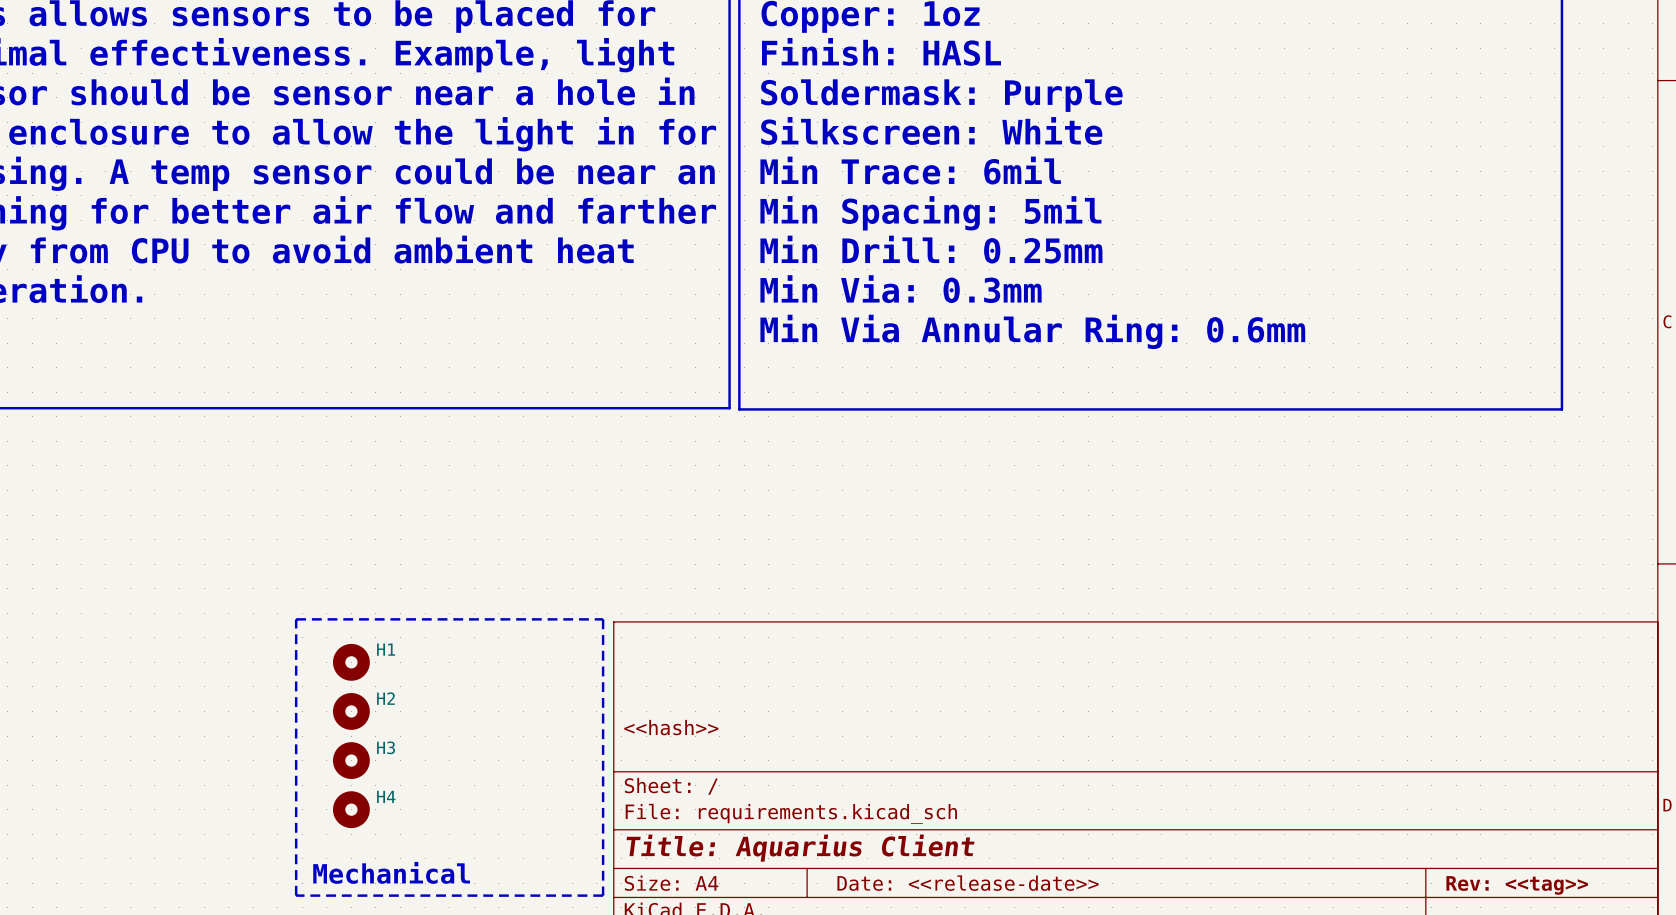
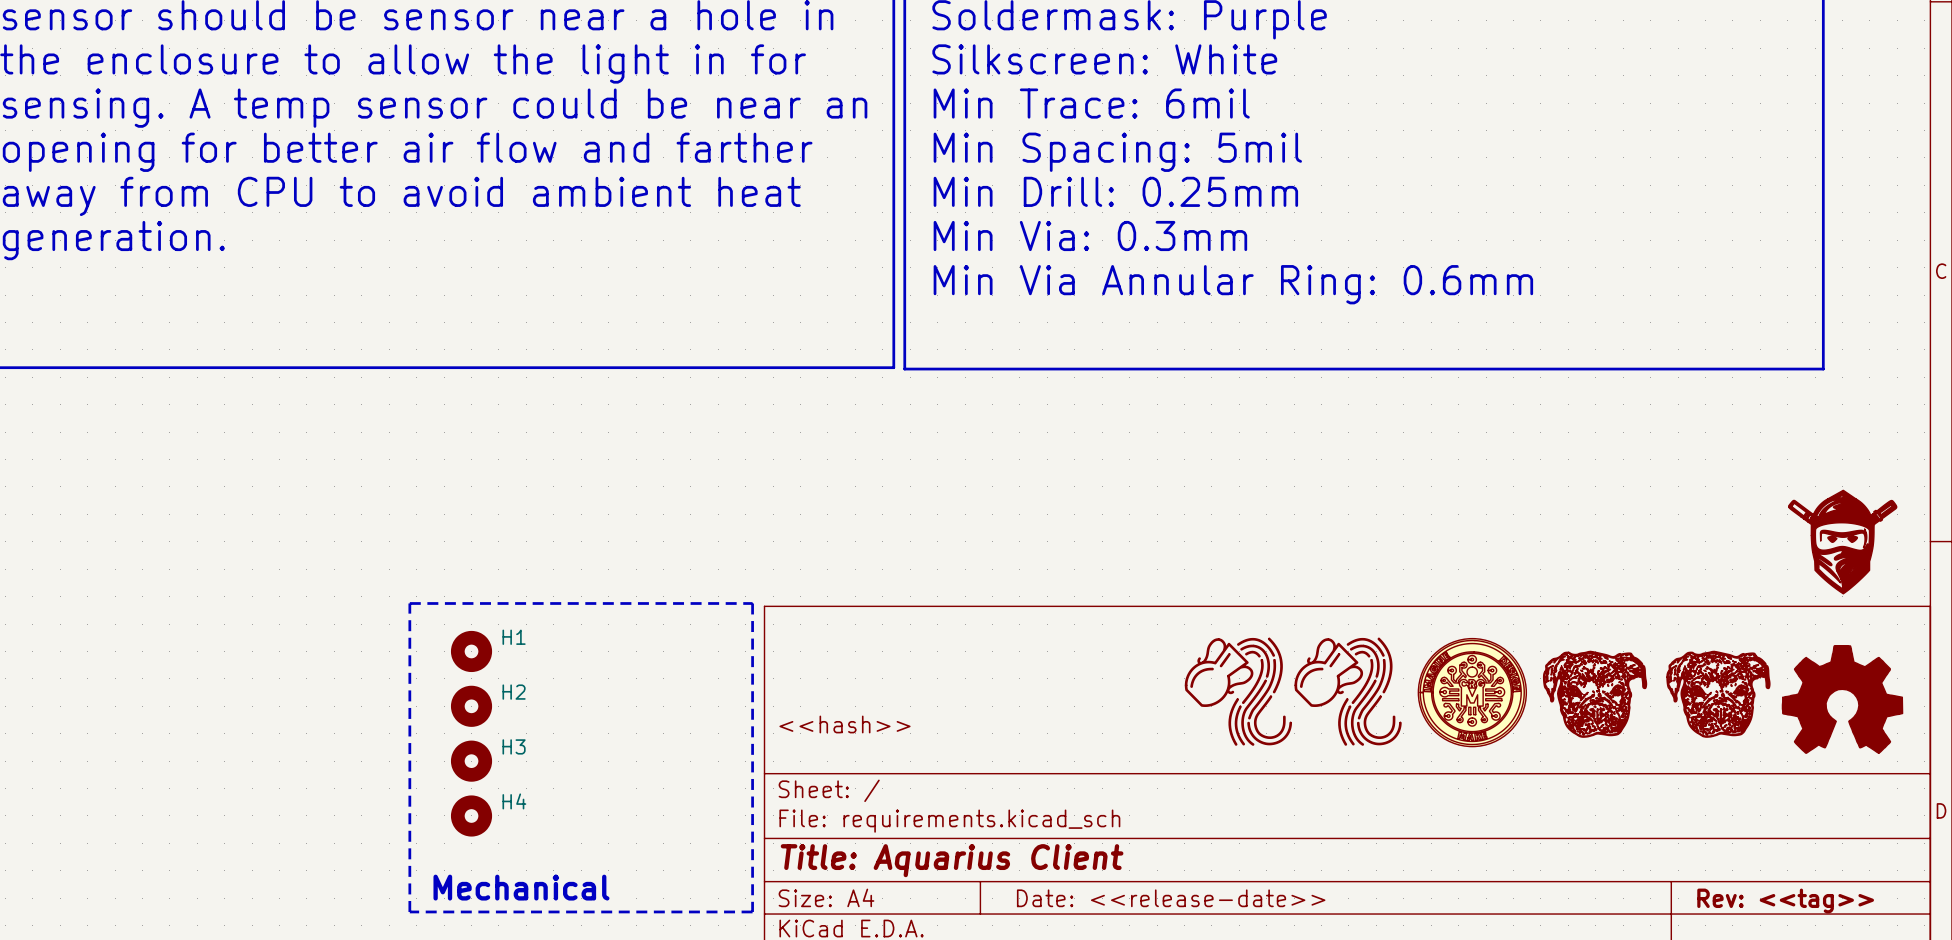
part: none -> (1842, 542)
part: none -> (1238, 691)
part: none -> (1348, 691)
part: none -> (1472, 692)
part: none -> (1595, 694)
part: none -> (1718, 694)
part: none -> (1842, 699)

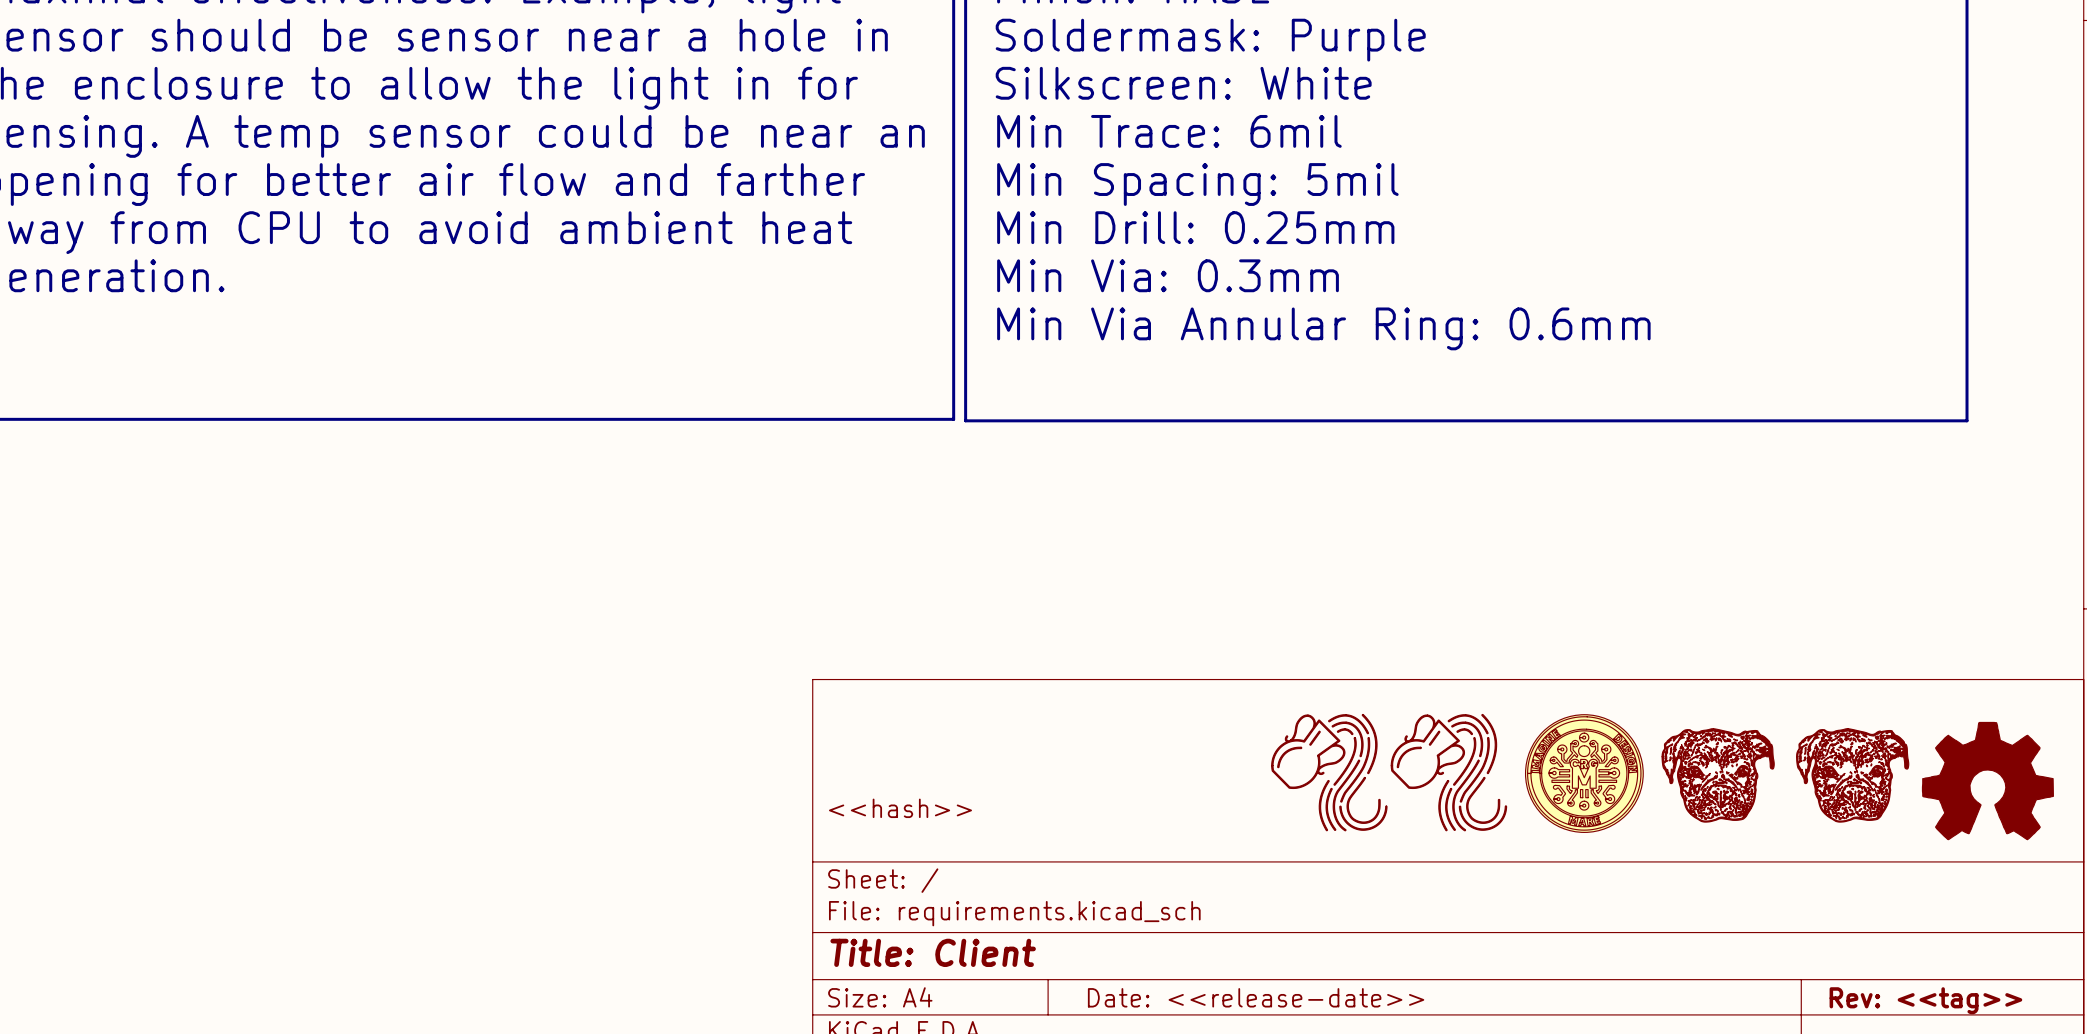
part: (1842, 542) -> none
line: (409, 603) (752, 603) (752, 911) (409, 911) (409, 603) -> none
H1: (471, 651) -> none
H2: (471, 706) -> none
H3: (471, 761) -> none
H4: (471, 815) -> none
title block: Title: Aquarius Client (952, 860) -> Title: Client (933, 952)
text: Mechanical (521, 887) -> none

